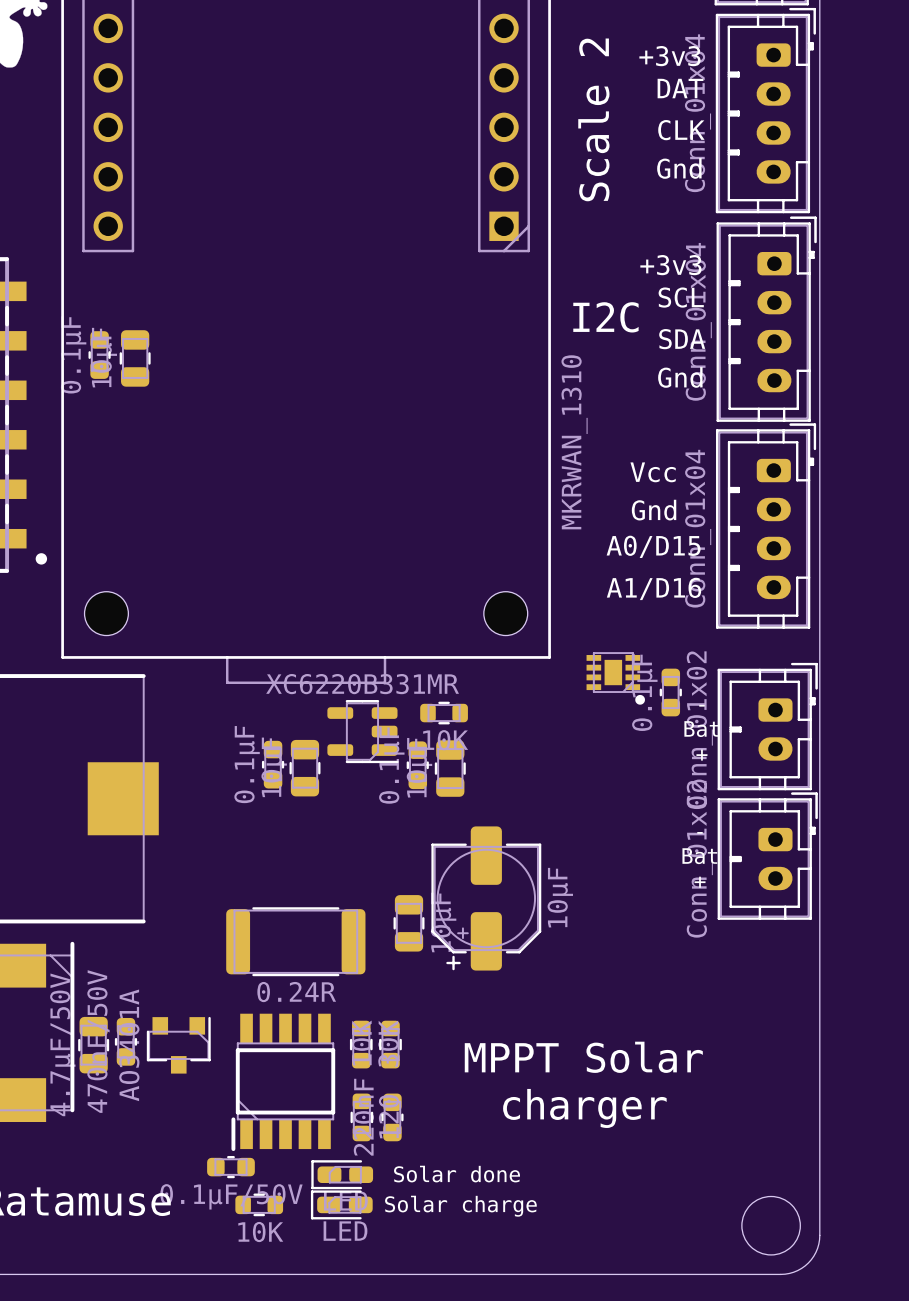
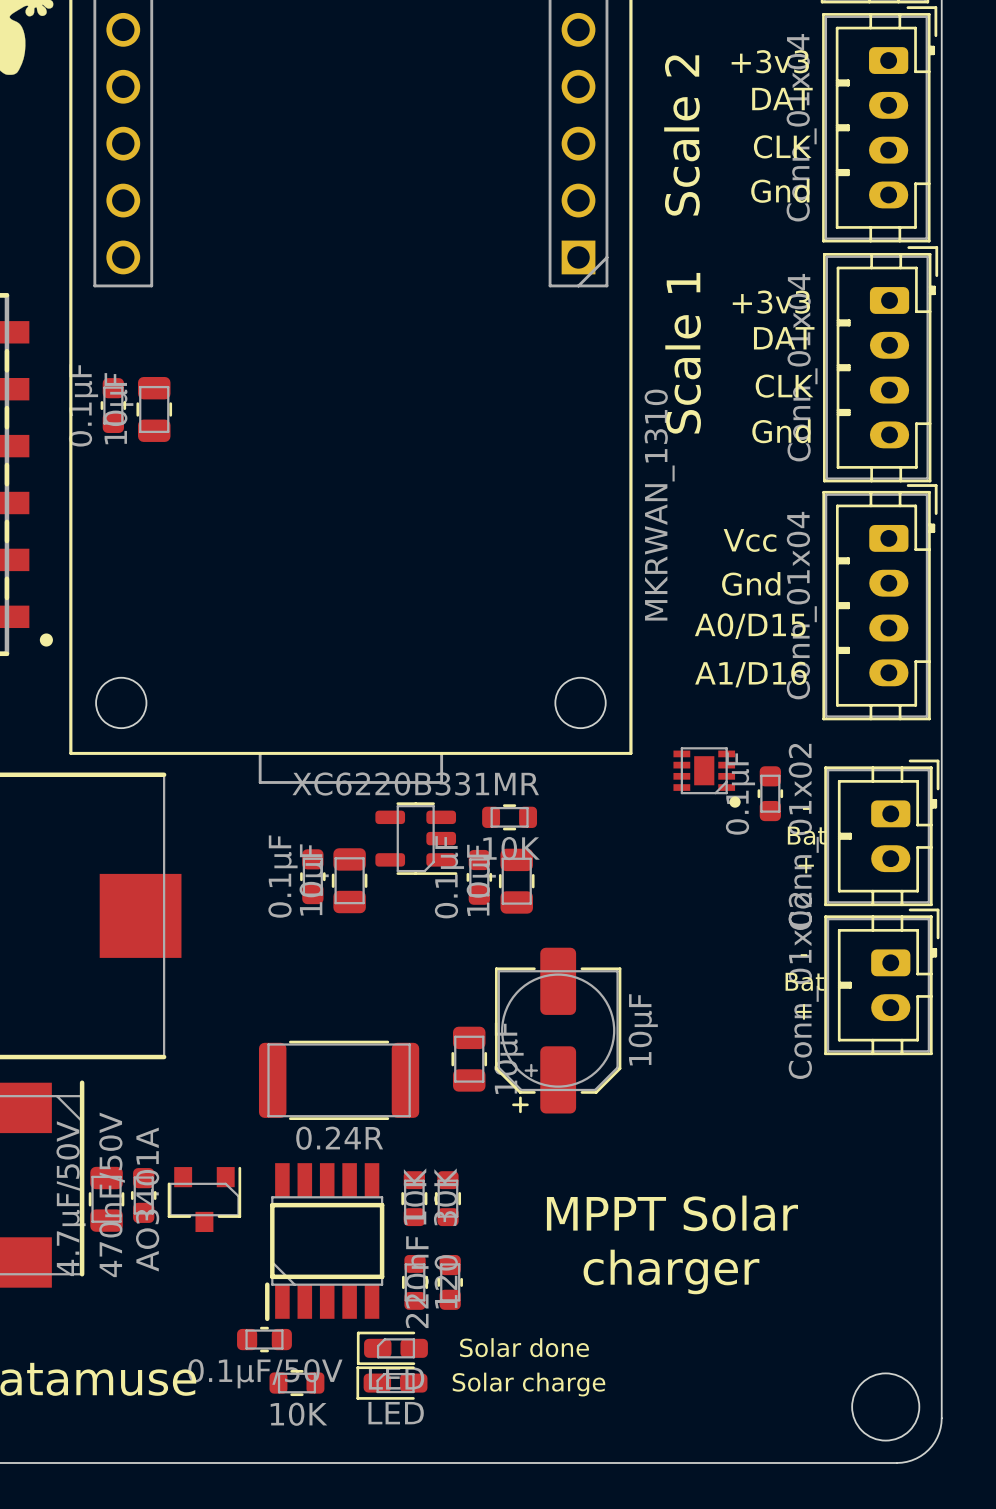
text: SCL (681, 297) -> DAT (784, 338)
text: I2C (605, 317) -> Scale 1 (683, 353)
text: SDA (682, 339) -> CLK (784, 386)

